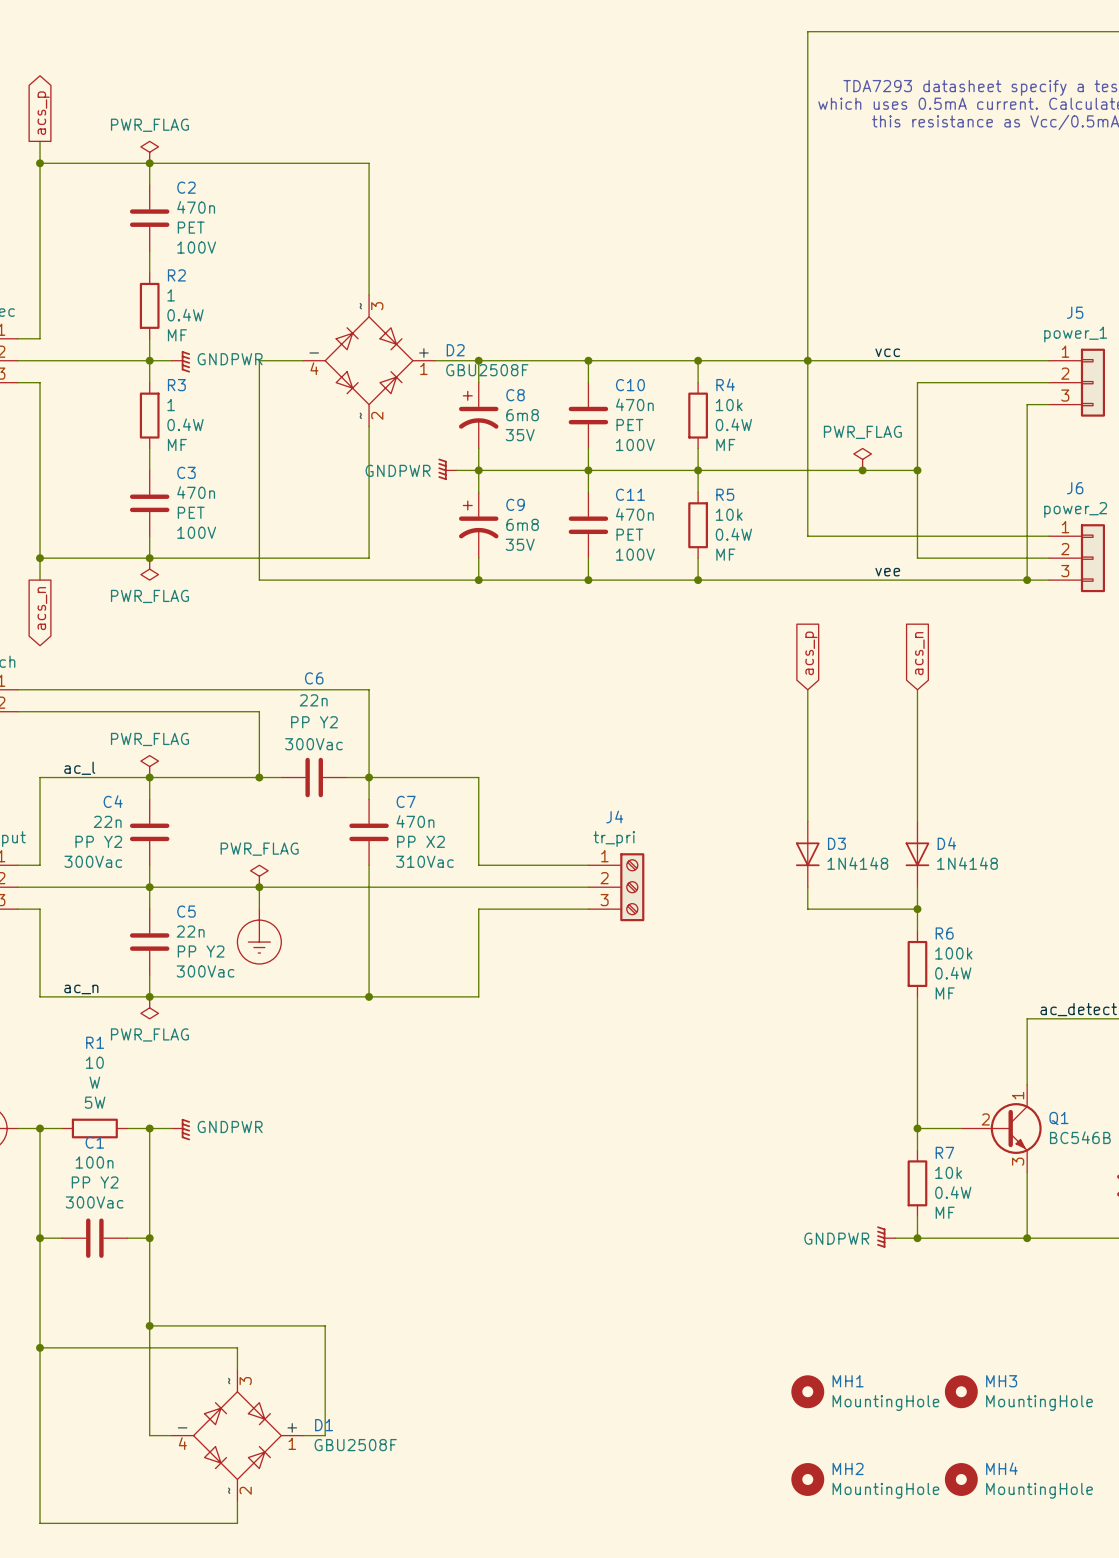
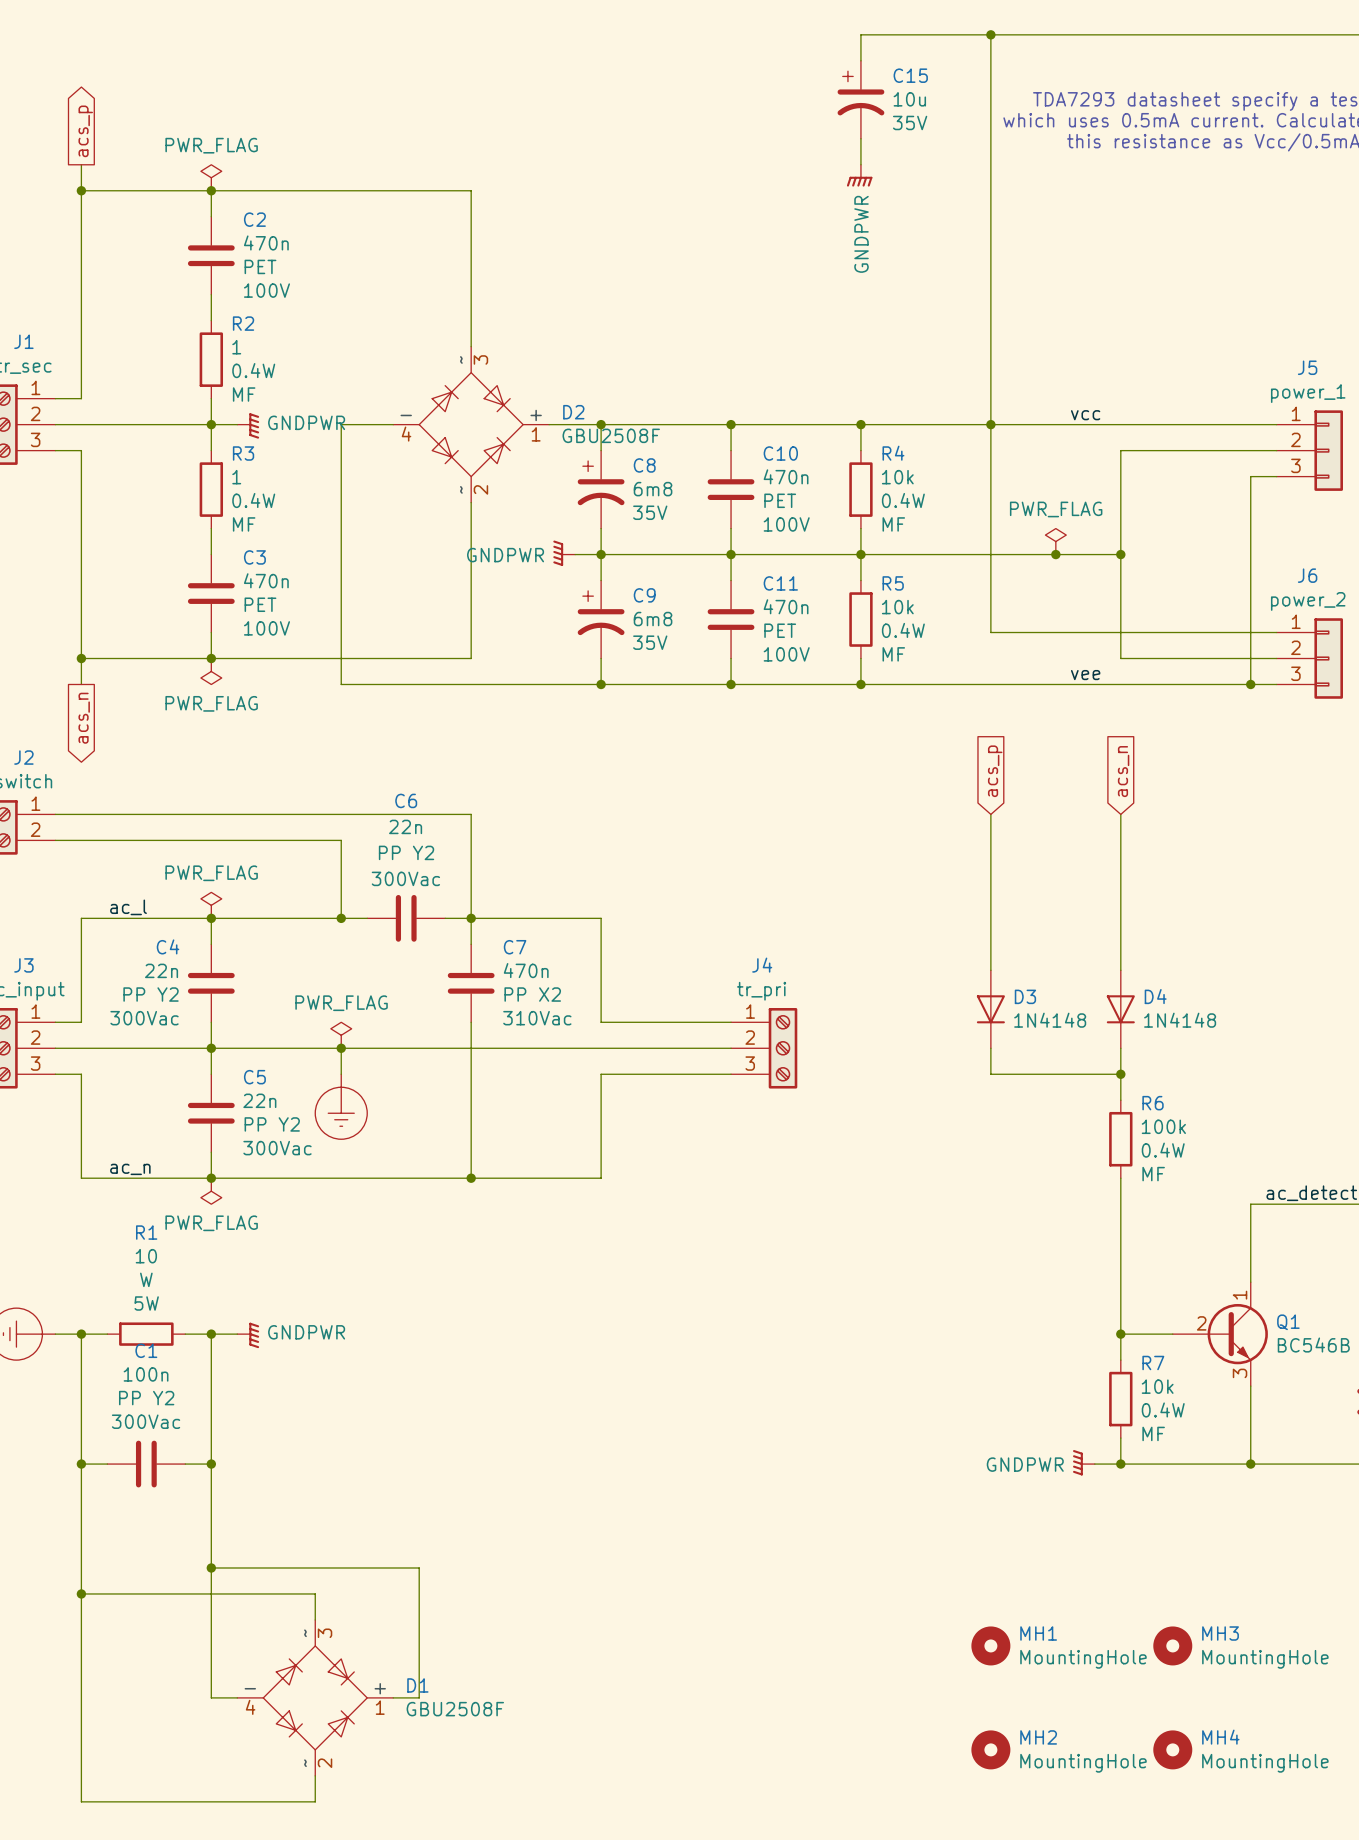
wire: none -> (990, 34) (860, 34) (860, 60)
junction: none -> (990, 34)
C15: none -> 10u (860, 99)
wire: none -> (860, 138) (860, 164)
power symbol: none -> GNDPWR (859, 175)

